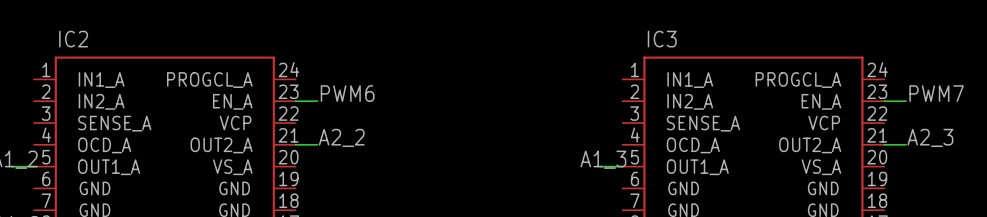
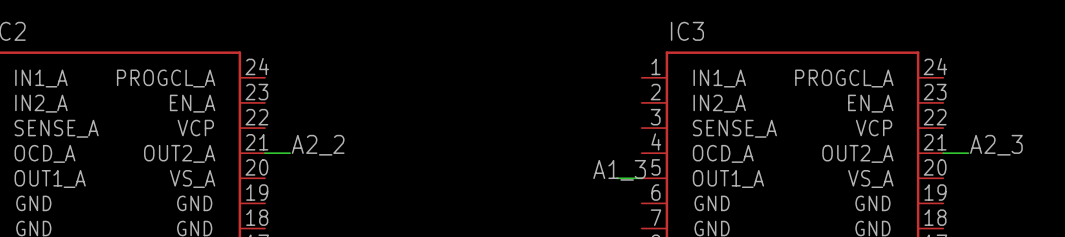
label: PWM6 (347, 93) -> none
label: PWM7 (936, 93) -> none
wire: (295, 101) (317, 101) -> none
wire: (884, 101) (906, 101) -> none

